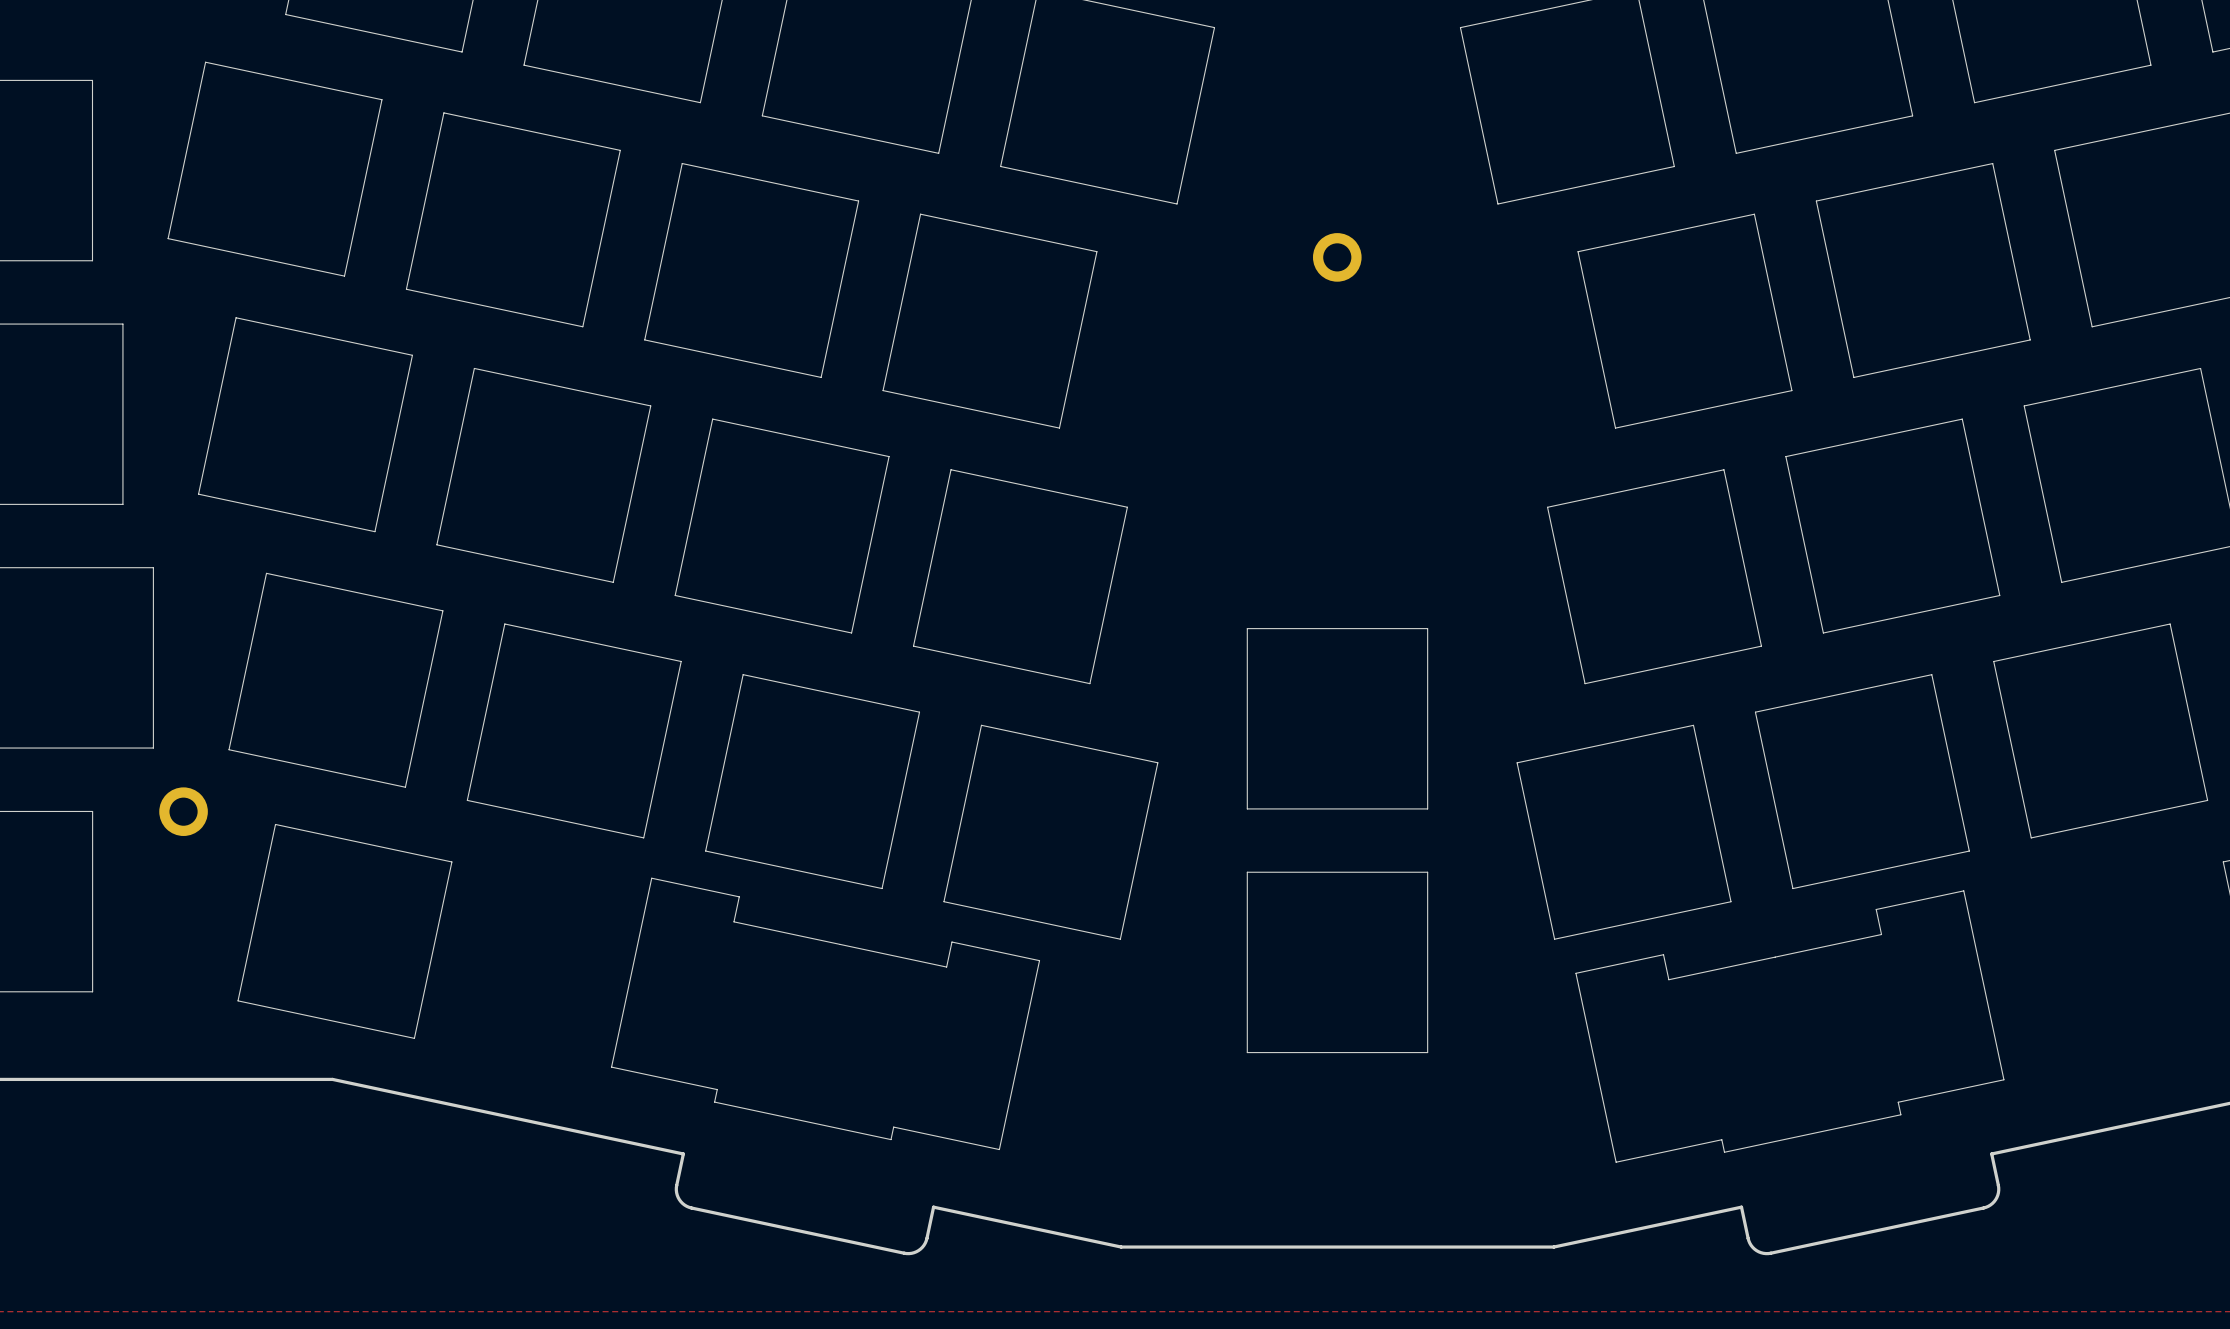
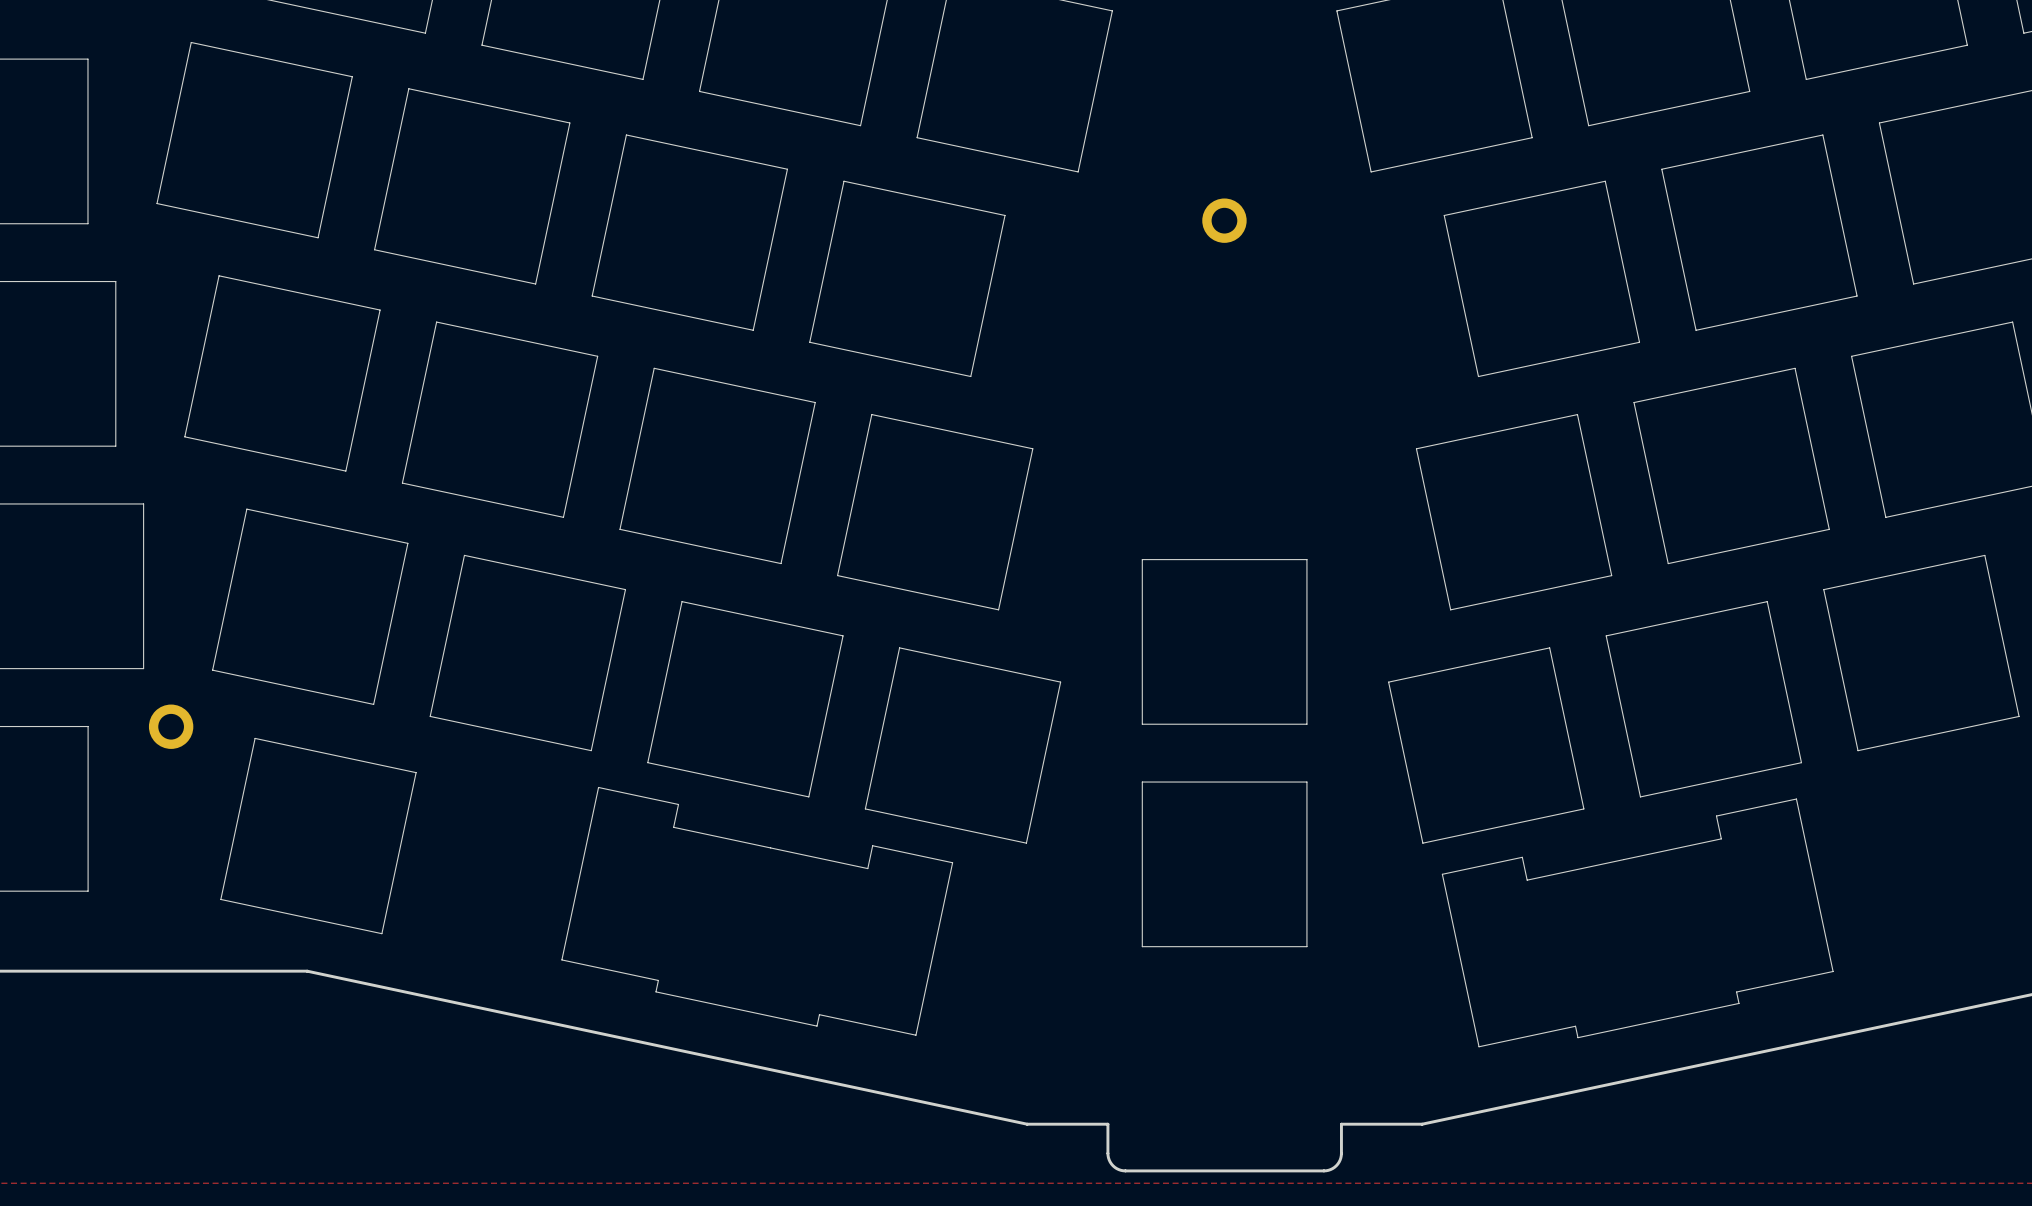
board edge: (683, 1153) (676, 1190) (679, 1199) (686, 1206) (904, 1253) (914, 1252) (923, 1245) (933, 1207) -> (627, 1039) (855, 1087)
board edge: (1991, 1153) (1998, 1192) (1994, 1201) (1983, 1208) (1765, 1253) (1756, 1250) (1749, 1243) (1741, 1207) -> (1821, 1039) (1593, 1087)
board edge: (1209, 1247) (1465, 1247) -> (1107, 1124) (1109, 1160) (1114, 1167) (1125, 1170) (1328, 1170) (1336, 1165) (1340, 1157) (1341, 1124)

